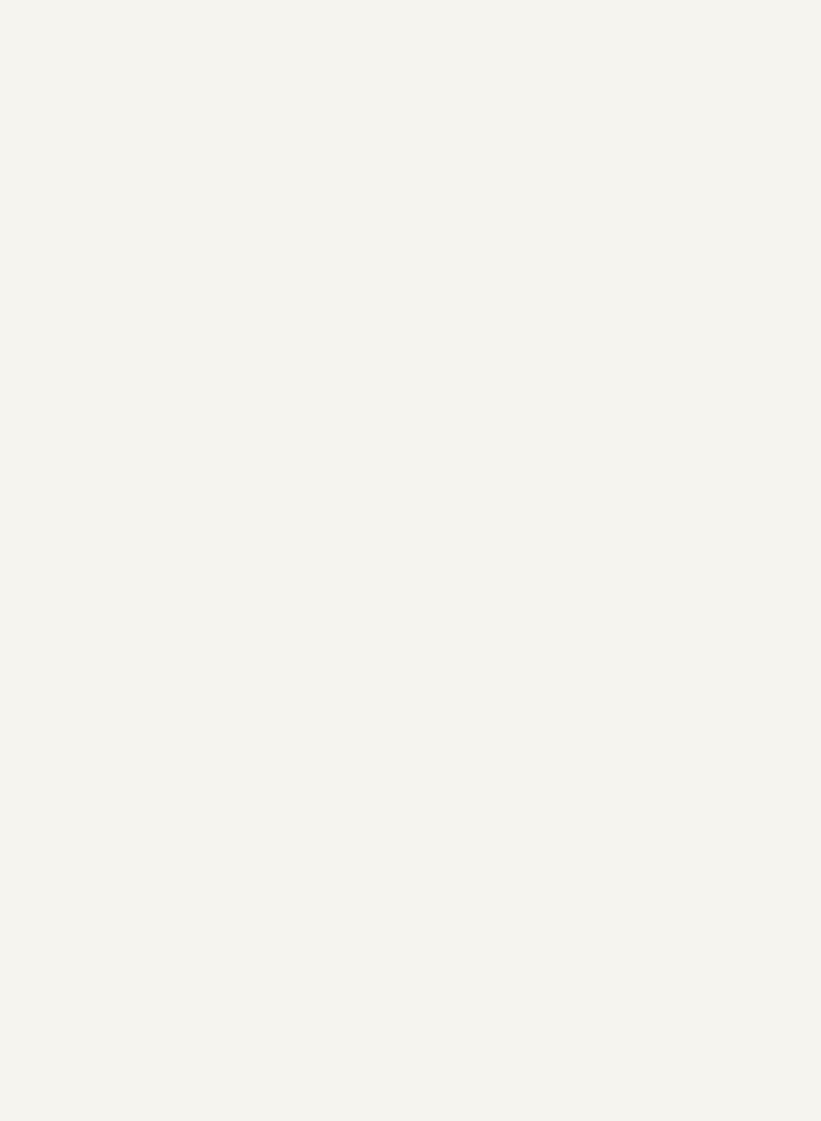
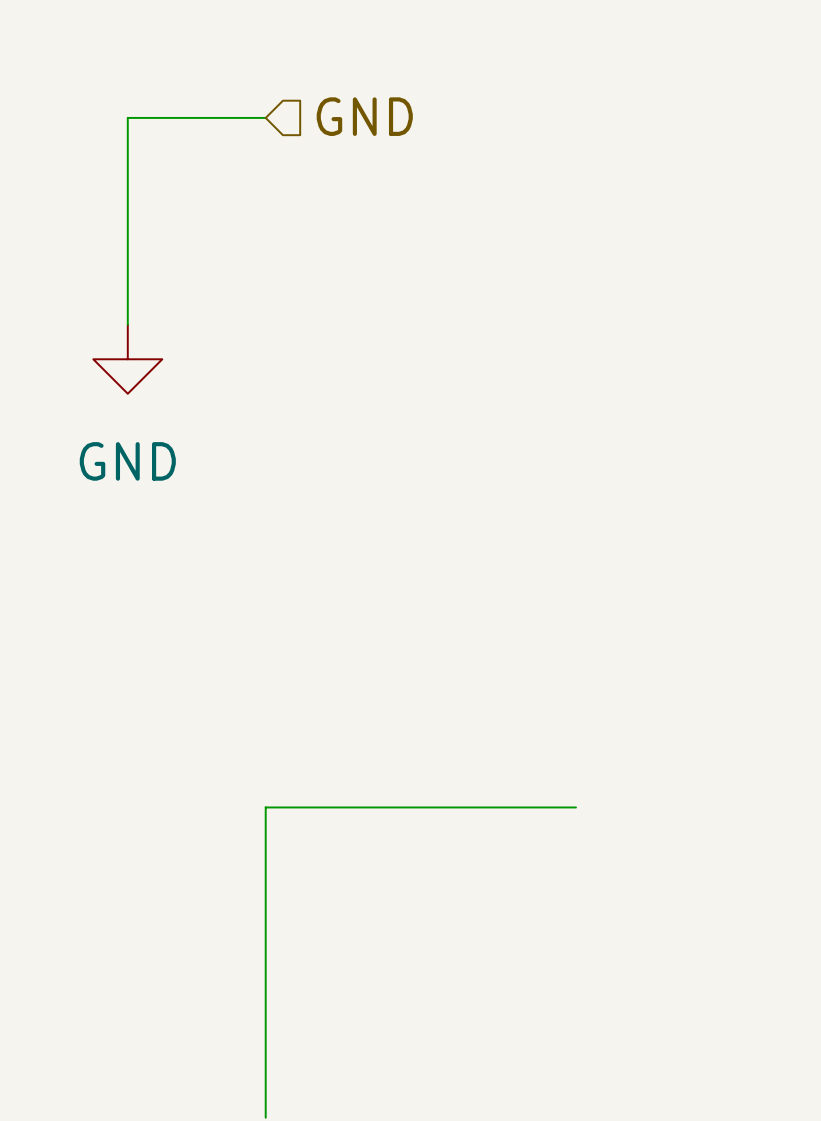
hierarchical label: none -> GND (364, 116)
wire: none -> (265, 117) (127, 117) (127, 324)
power symbol: none -> GND (127, 359)
wire: none -> (576, 807) (265, 807) (265, 1117)

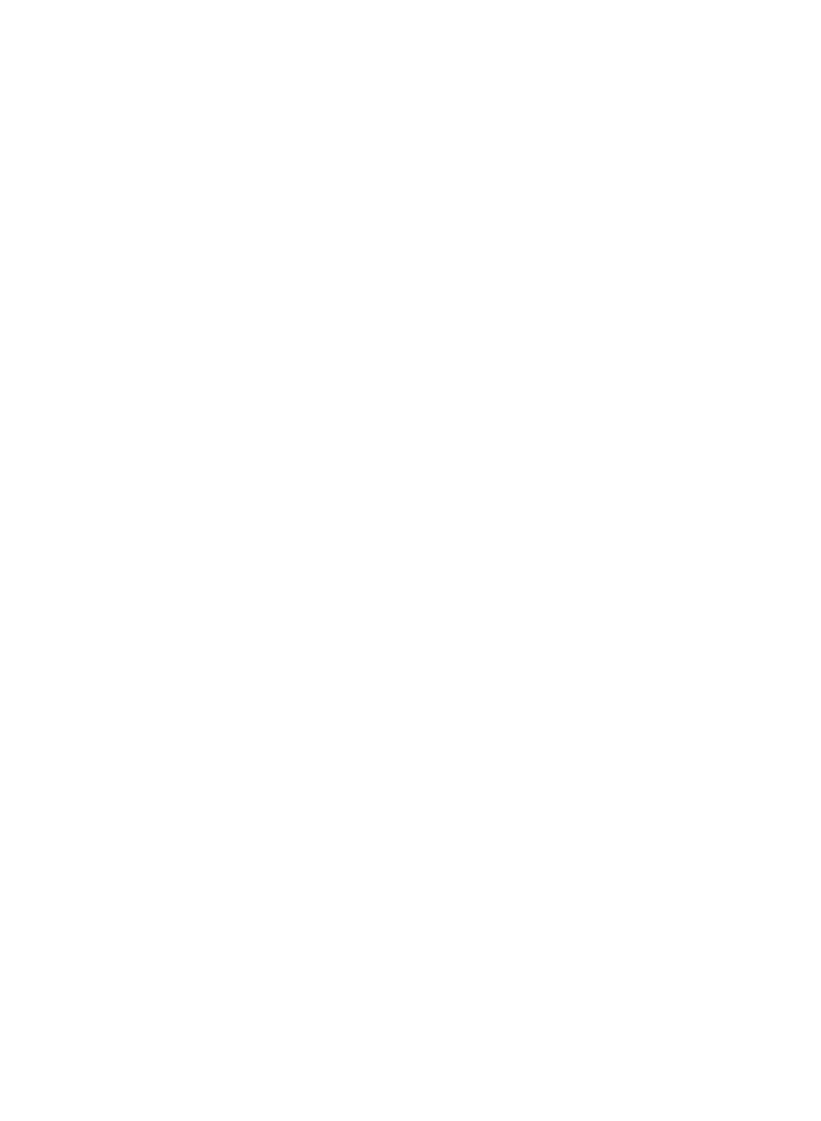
hierarchical label: GND (364, 116) -> none
wire: (265, 117) (127, 117) (127, 324) -> none
power symbol: GND (127, 359) -> none
wire: (576, 807) (265, 807) (265, 1117) -> none

